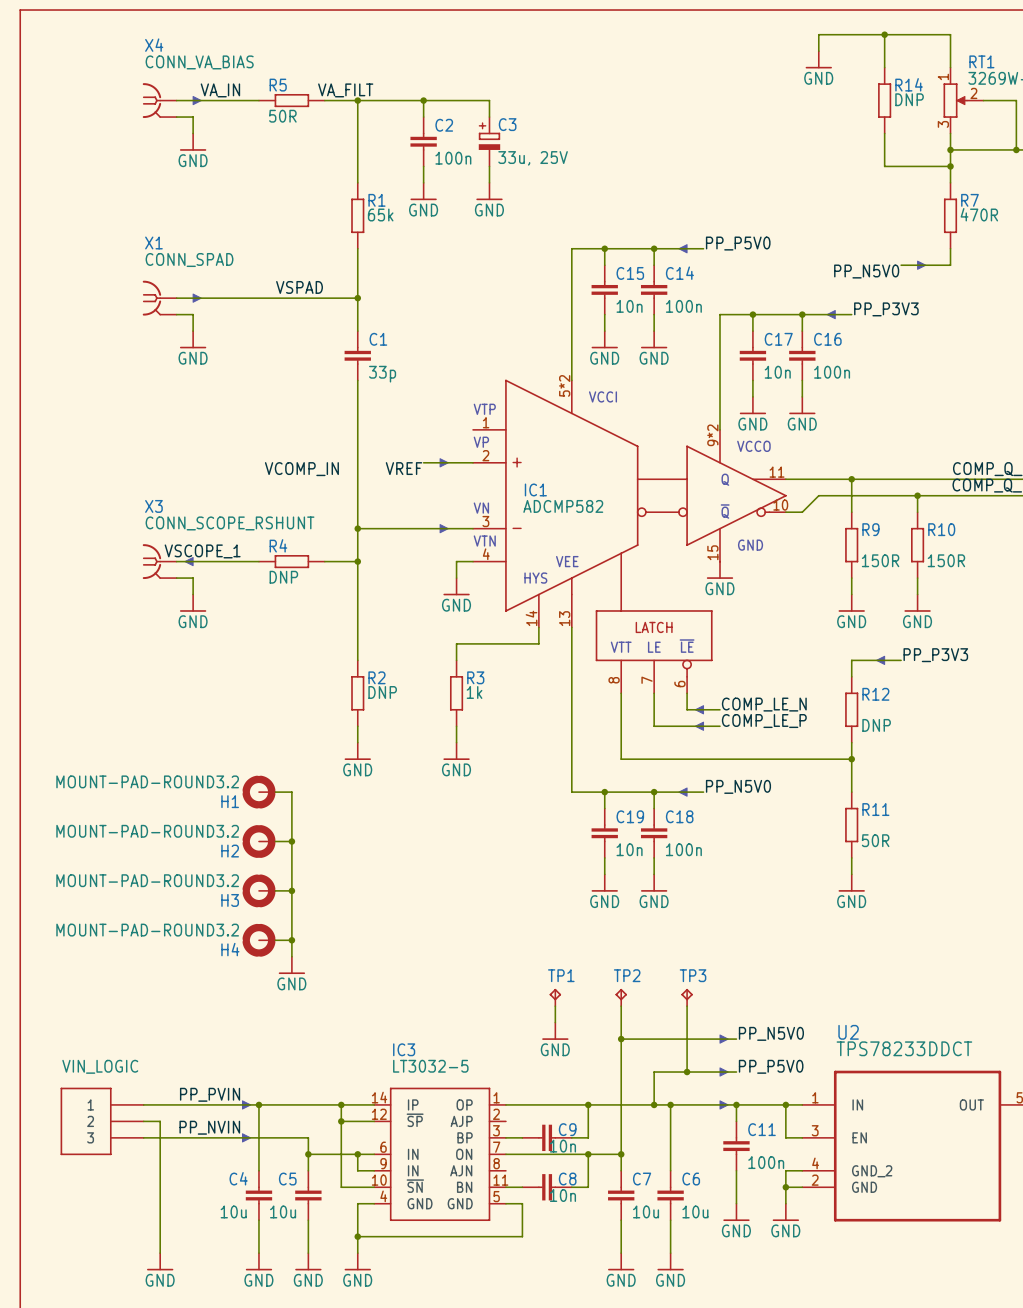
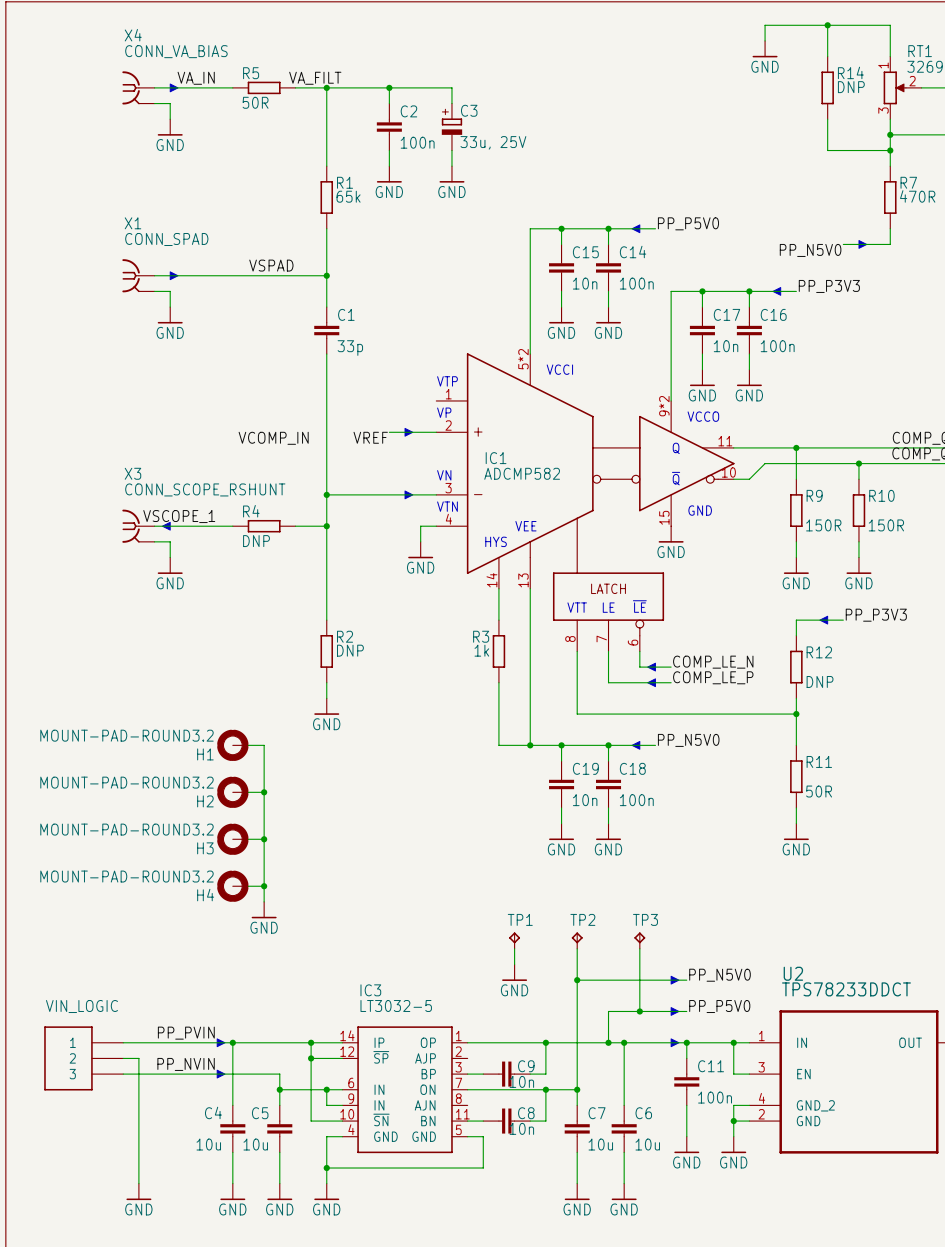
wire: (538, 643) (456, 643) (456, 660) -> (498, 604) (498, 620)
R3 name position: R3 (475, 677) -> R3 (481, 636)
R3 value position: 1k (474, 692) -> 1k (481, 650)
R3 position: (456, 693) -> (498, 651)
wire: (456, 726) (456, 742) -> none
wire: none -> (498, 682) (498, 745) (530, 745)
power symbol: GND (456, 751) -> none
junction: none -> (530, 745)

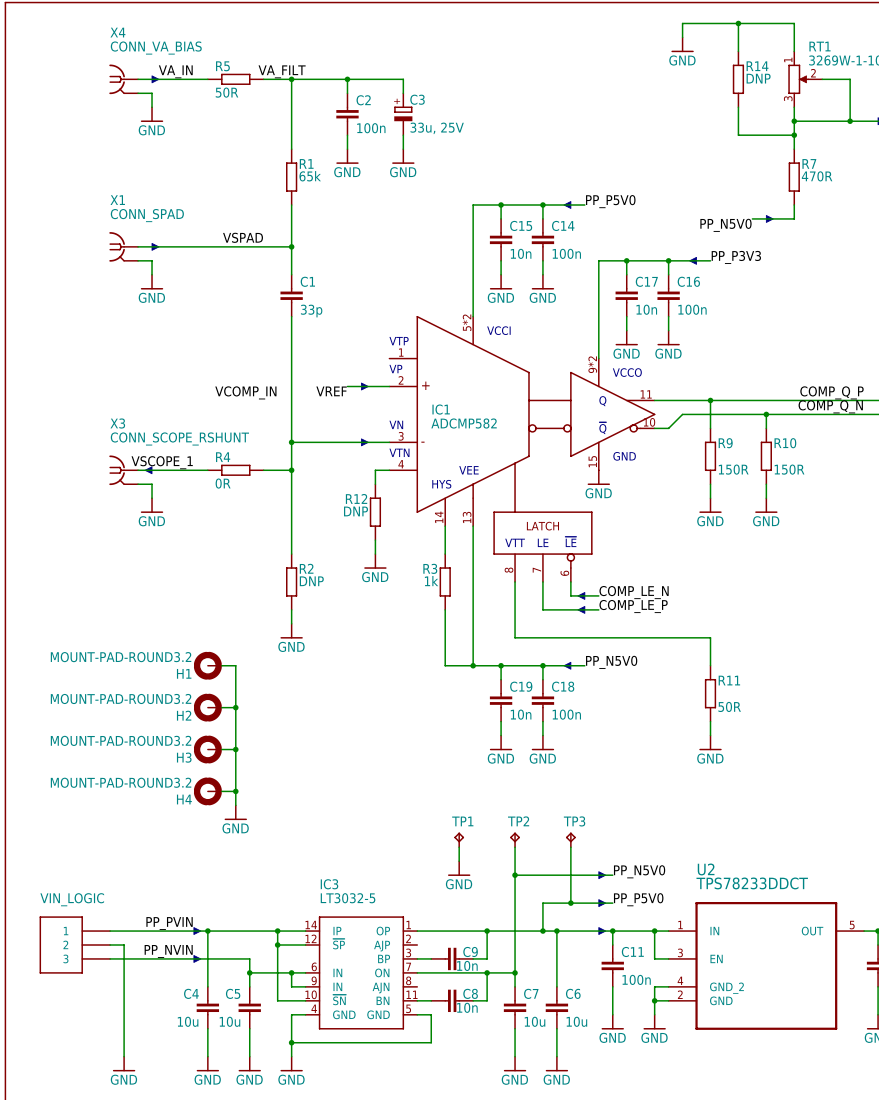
R4 value: DNP (256, 541) -> 0R (223, 483)
power symbol position: GND (420, 550) -> GND (375, 561)
wire: none -> (375, 540) (375, 554)
label: PP_P3V3 (876, 615) -> none
part: (823, 620) -> none
wire: (843, 620) (796, 620) (796, 635) -> none
R12 name position: R12 (819, 652) -> R12 (356, 498)
R12 position: (796, 667) -> (375, 512)
R12 value position: DNP (820, 681) -> DNP (356, 511)
wire: (796, 698) (796, 714) -> none
junction: (796, 714) -> none

